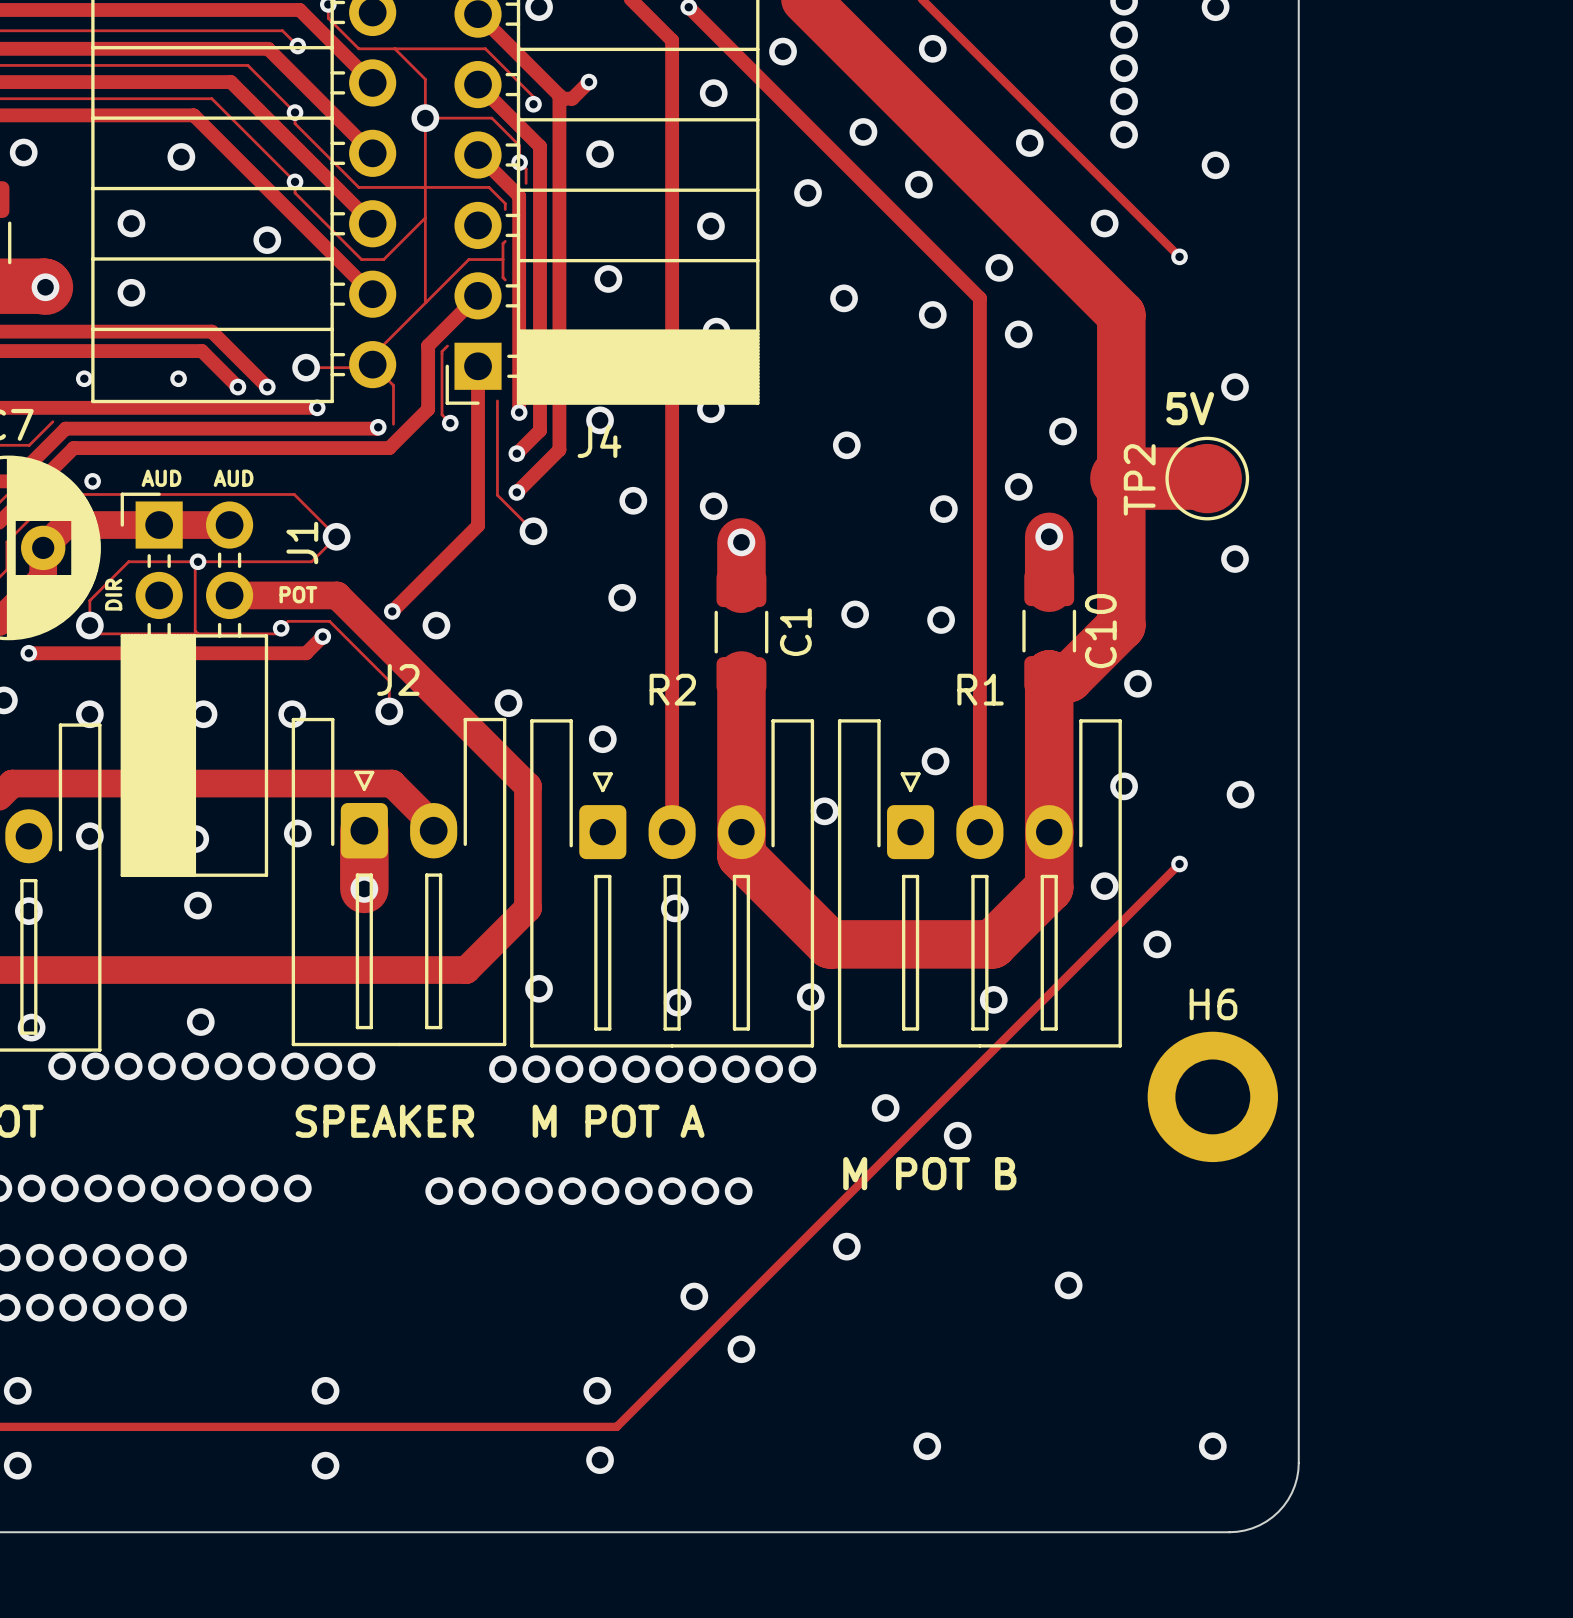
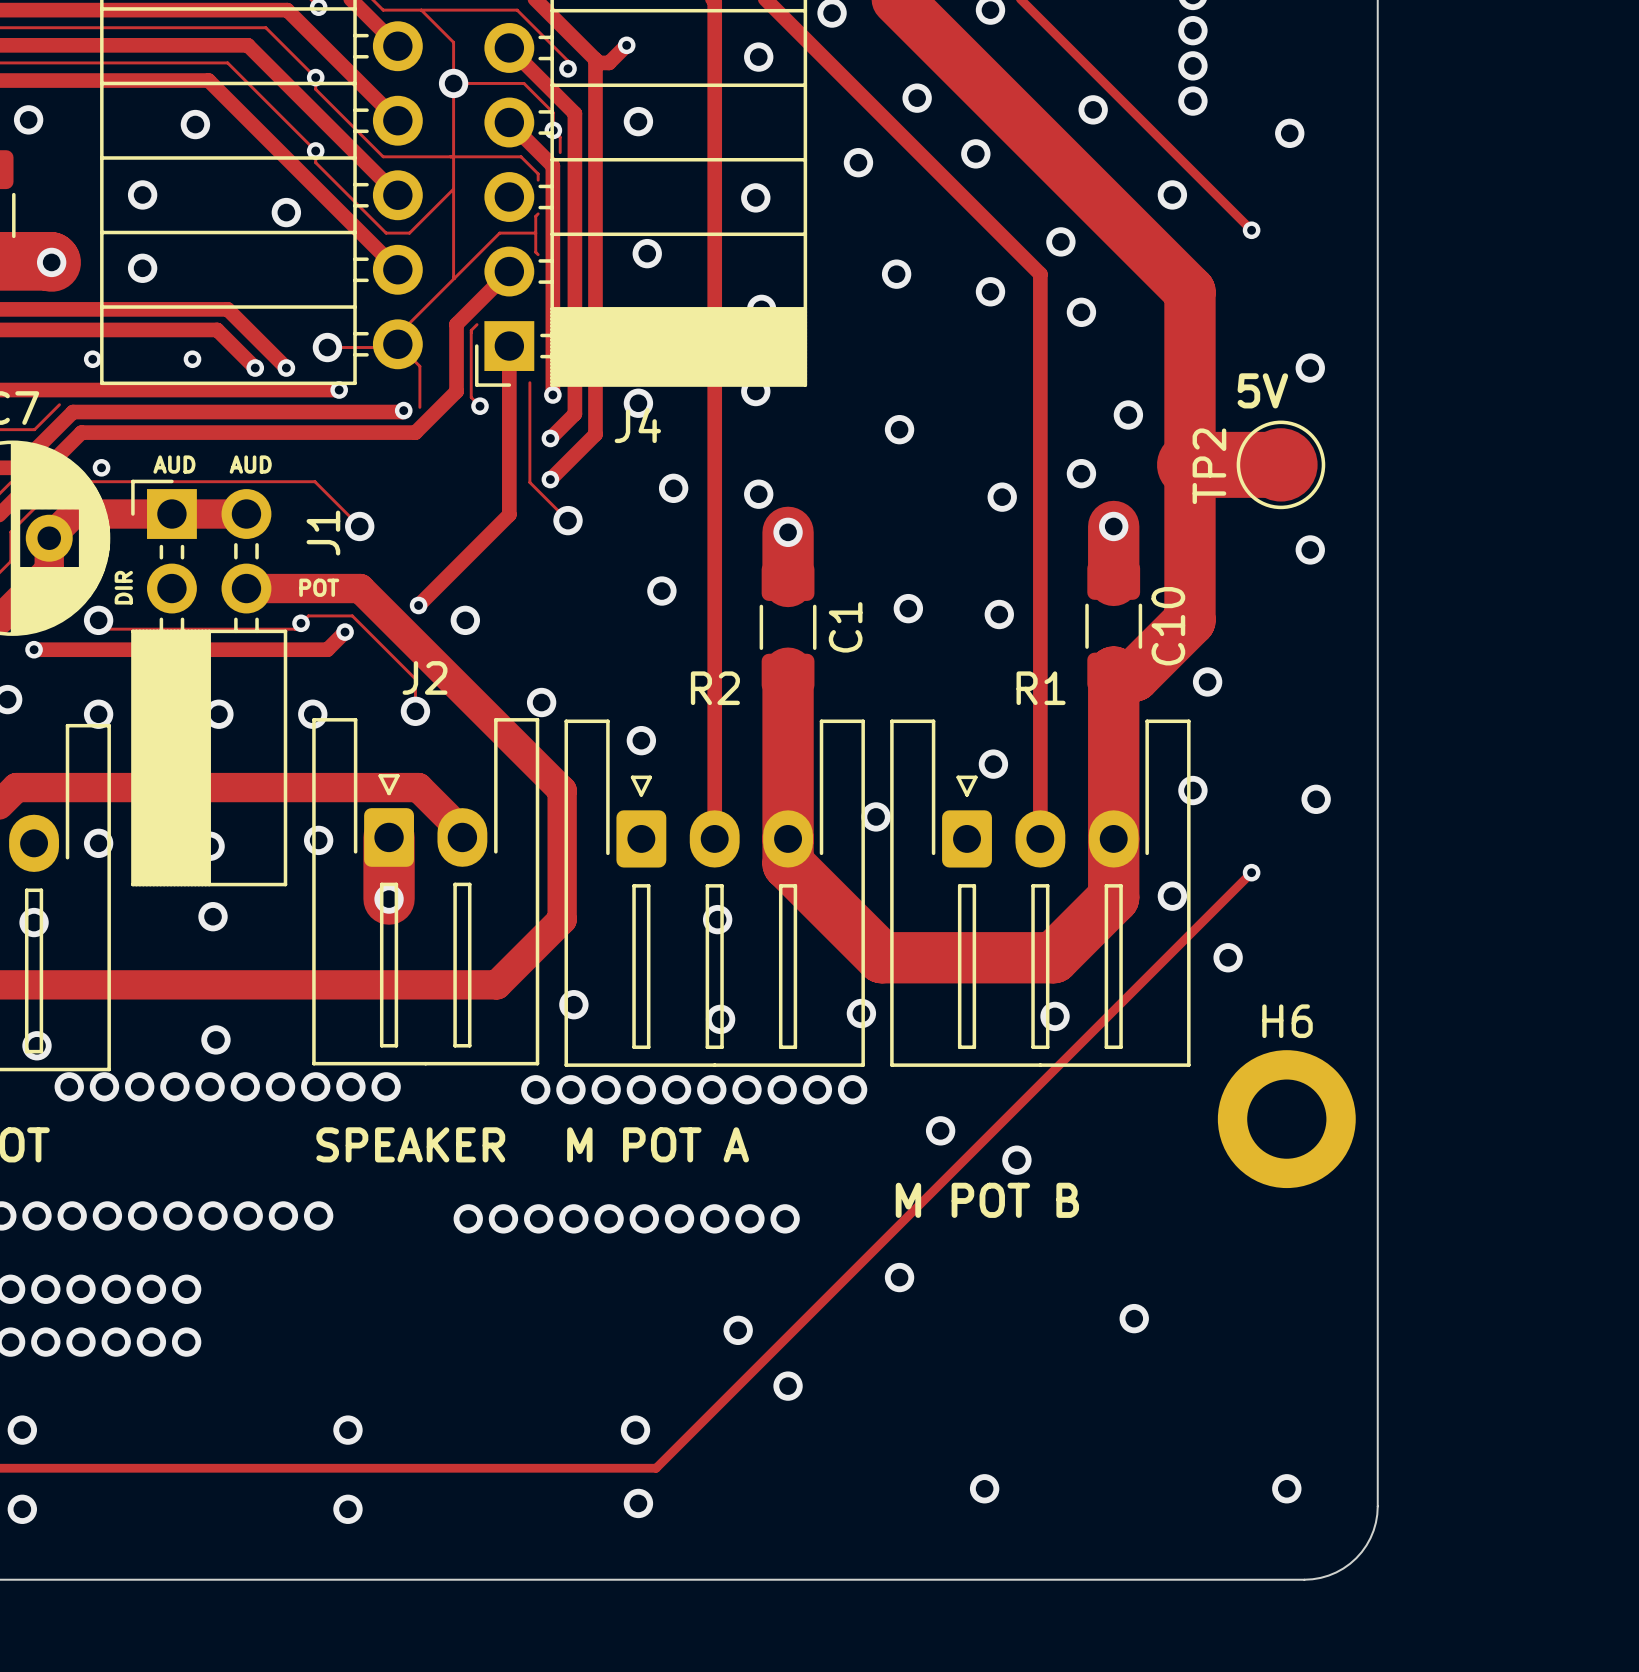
track: (336, 536) (311, 561) (128, 561) (89, 600) (89, 625) -> none
track: (197, 561) (195, 564) (195, 631) (197, 633) -> none
via: (197, 561) -> none

